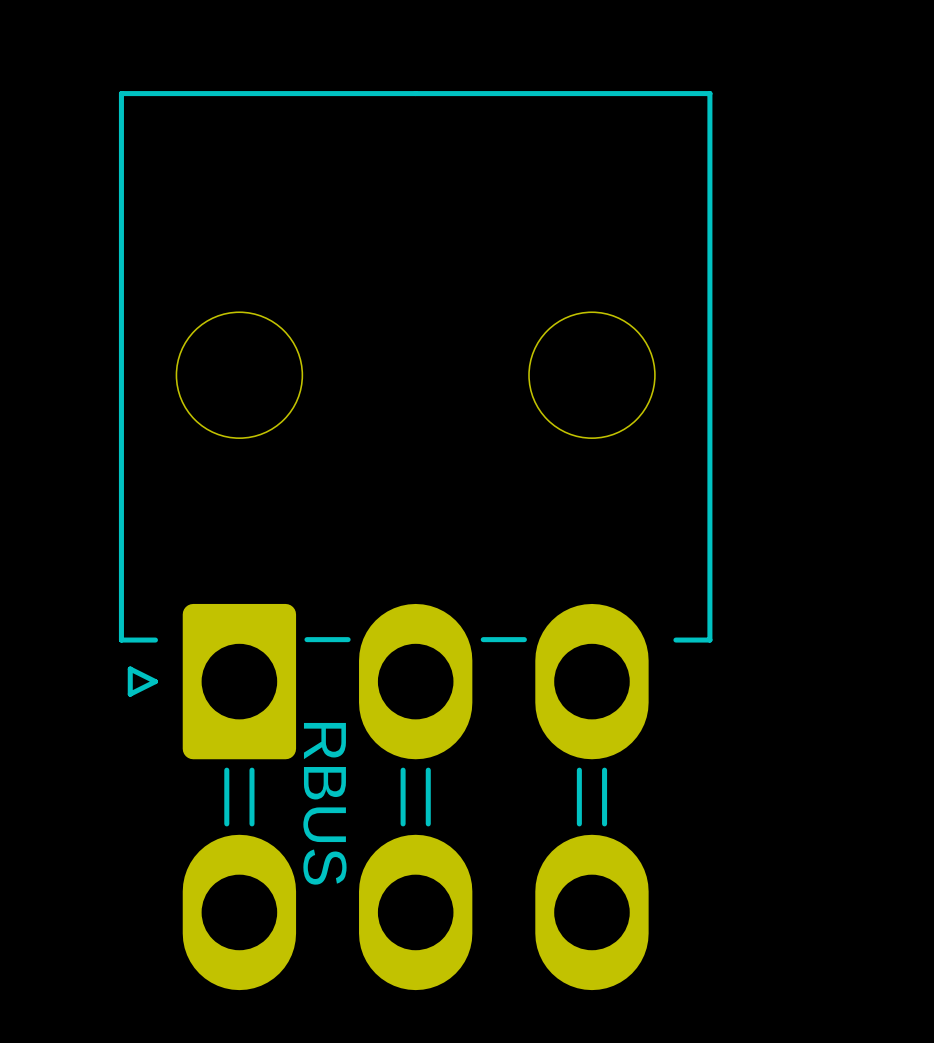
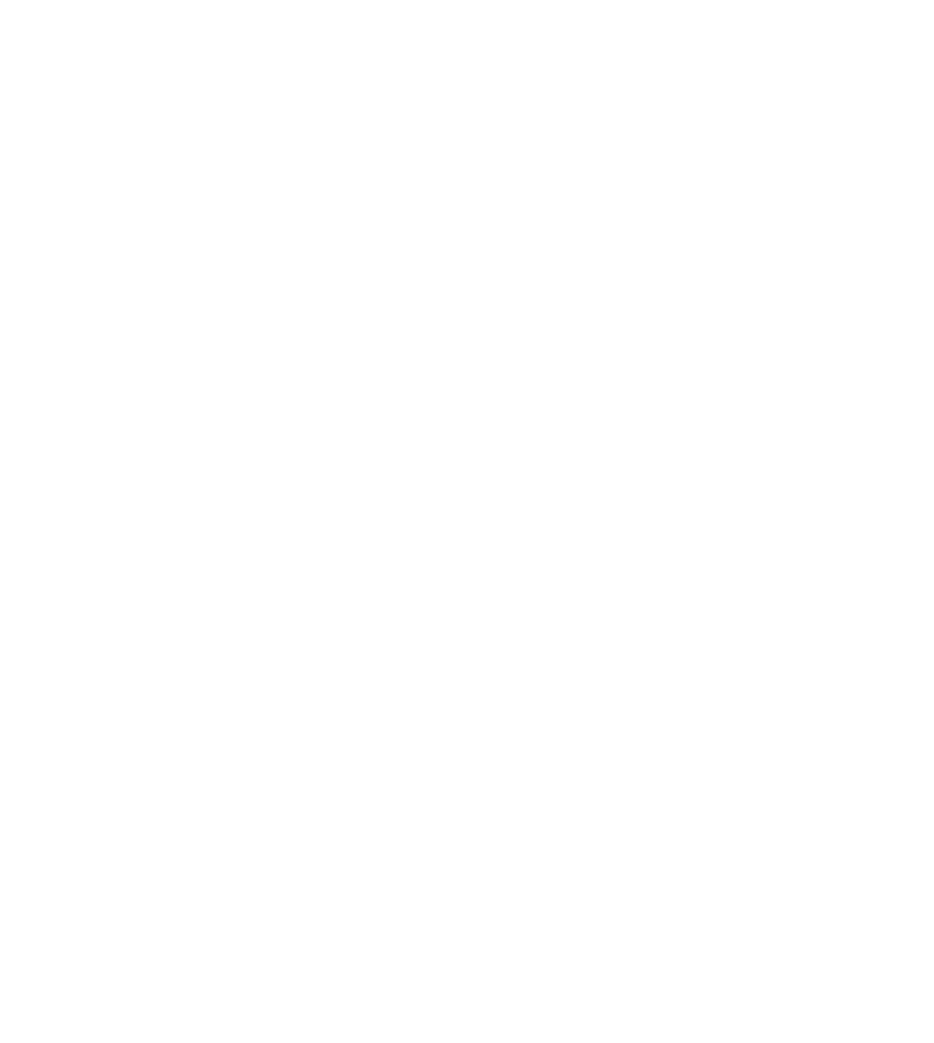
part: (415, 540) -> none

